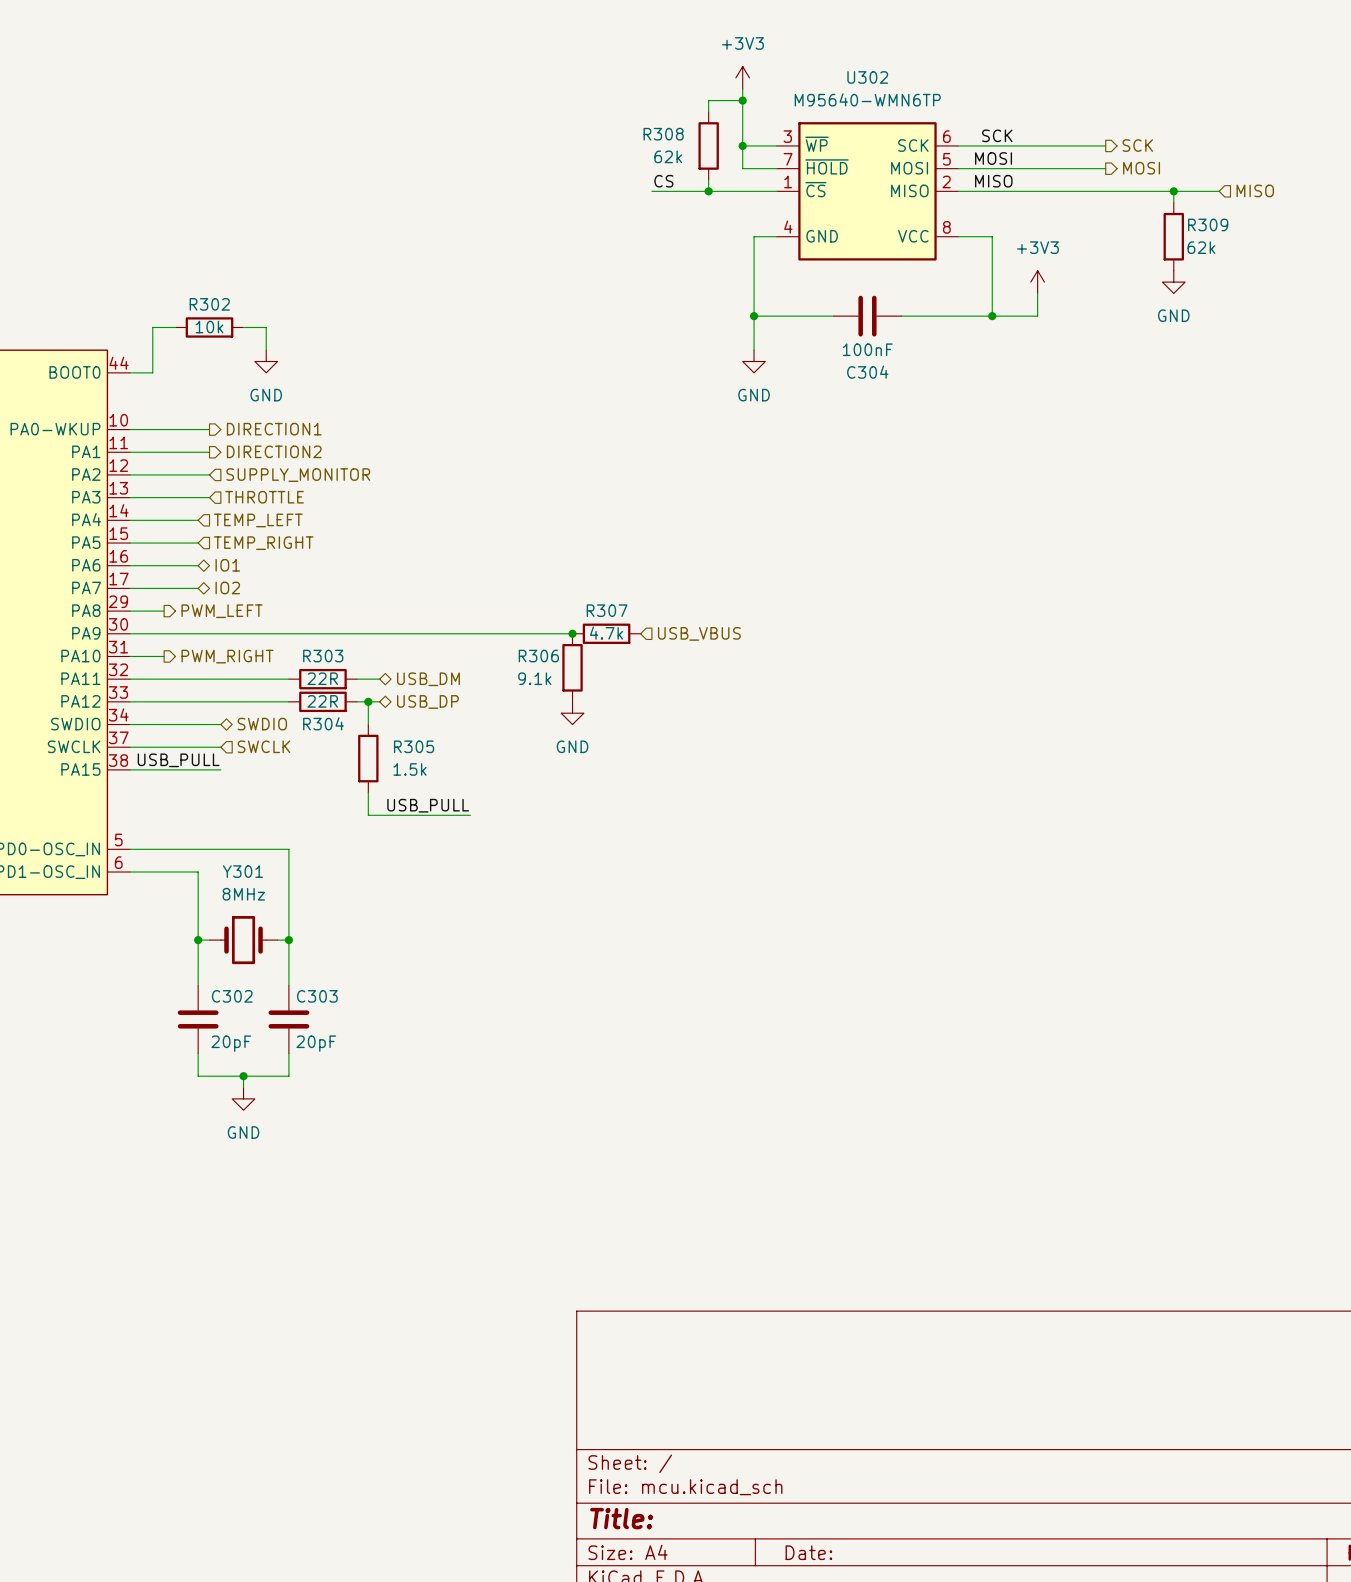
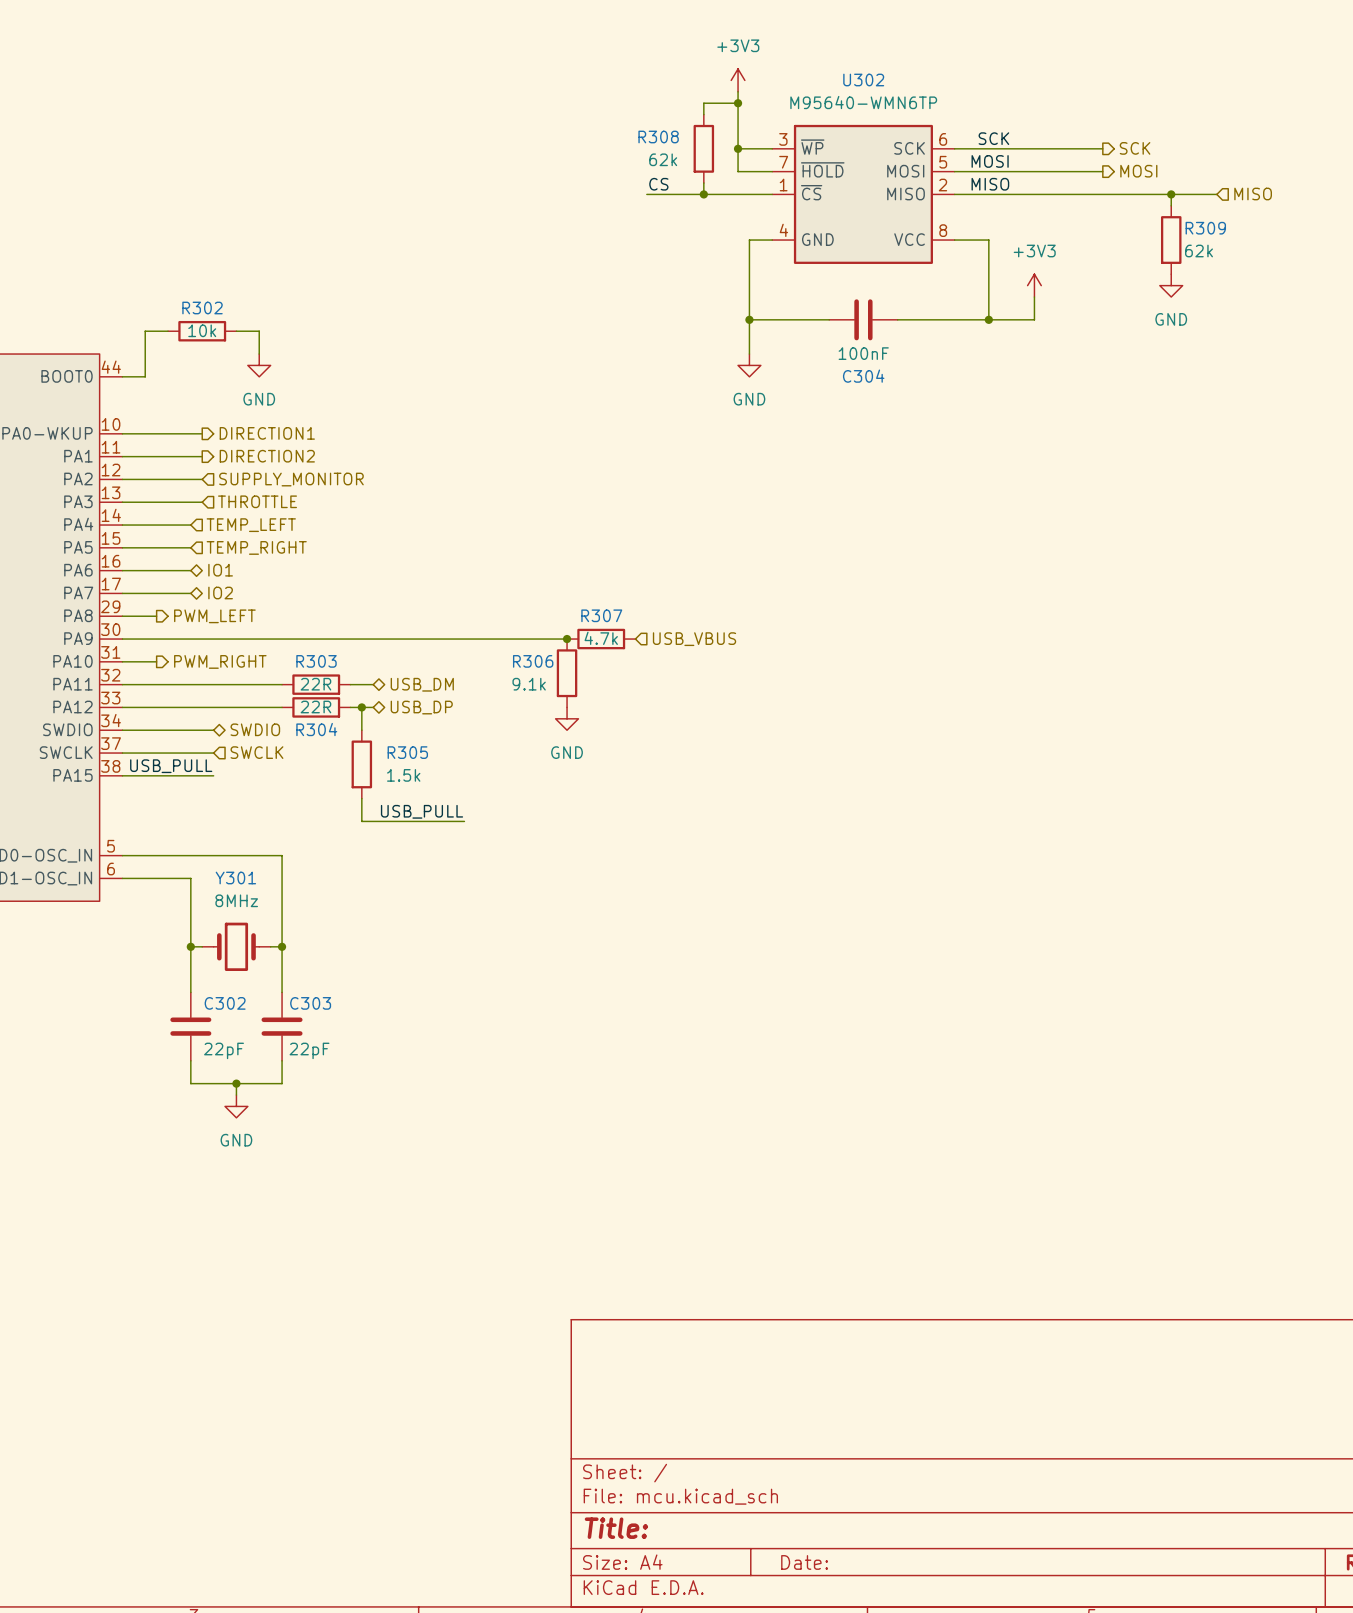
C302 value: 20pF (231, 1043) -> 22pF (224, 1050)
C303 value: 20pF (316, 1043) -> 22pF (309, 1050)

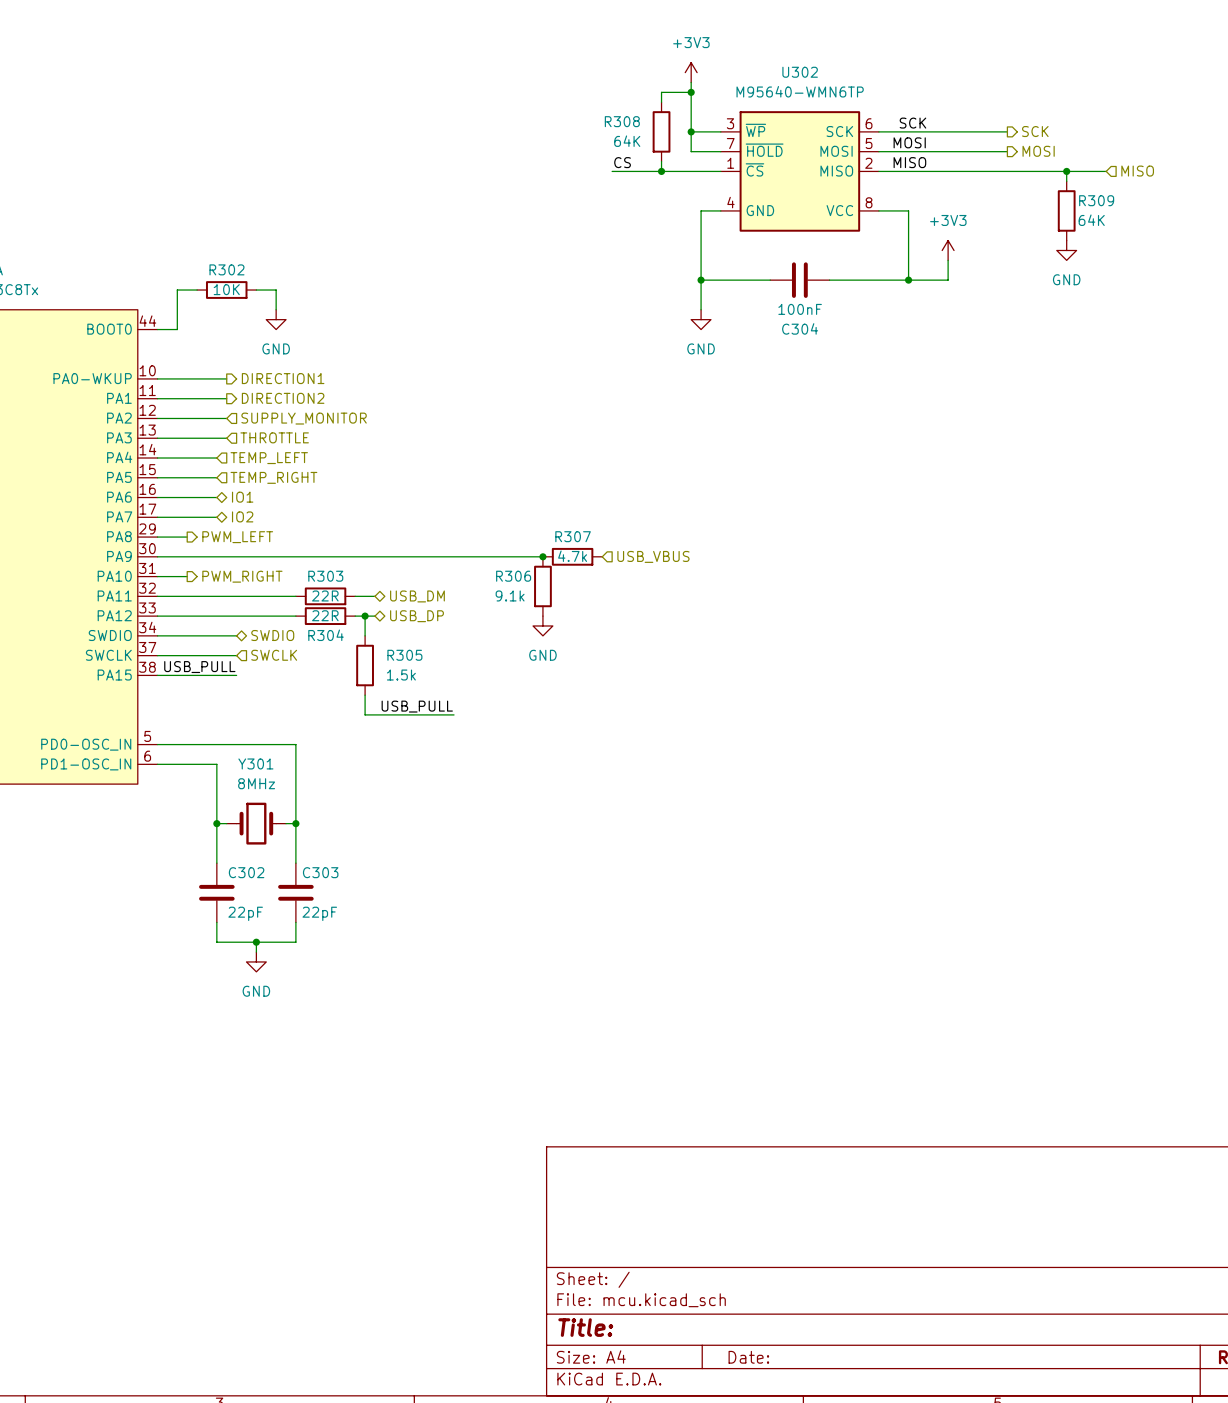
R308 value: 62k (663, 159) -> 64K (627, 141)
R309 value: 62k (1199, 251) -> 64K (1091, 220)
R302 value: 10k (202, 330) -> 10K (226, 289)

